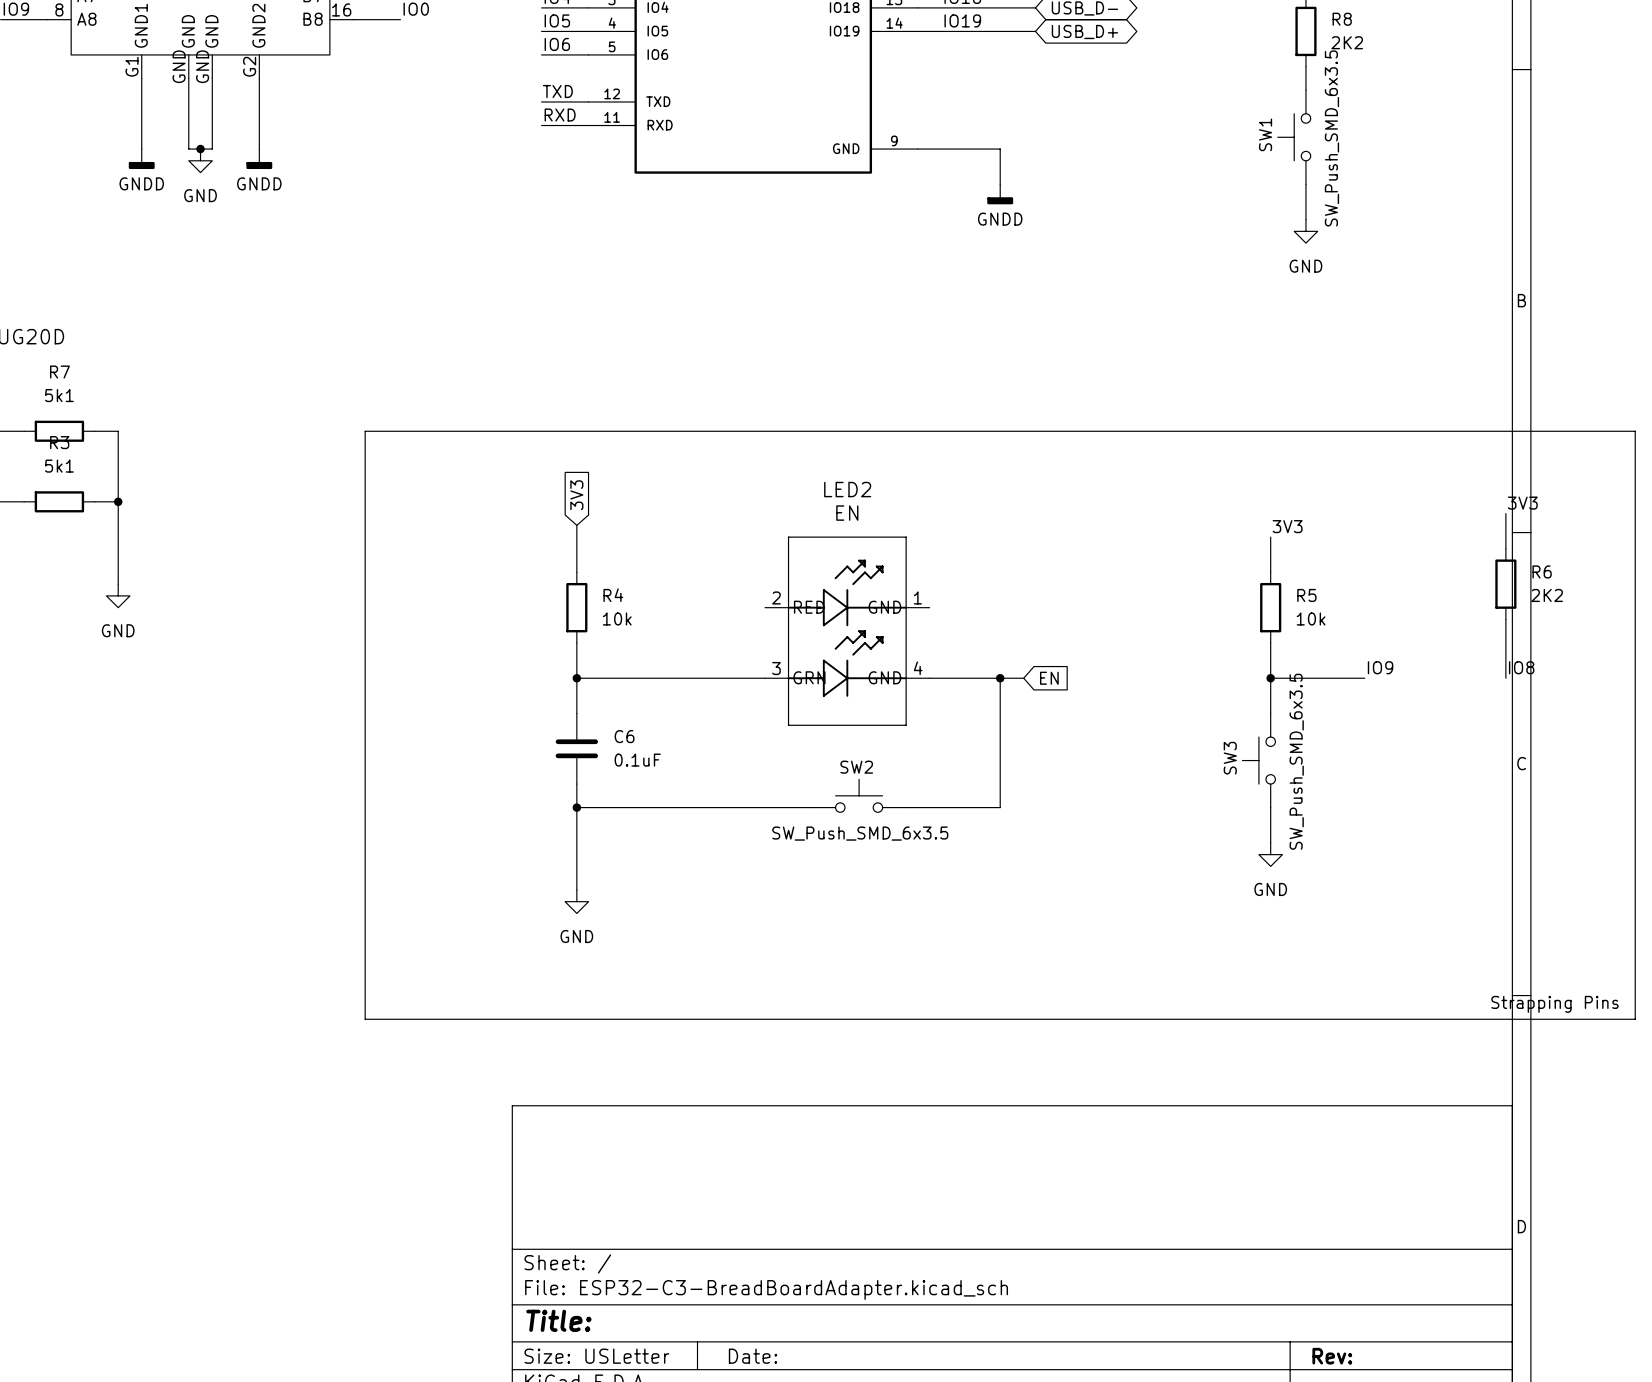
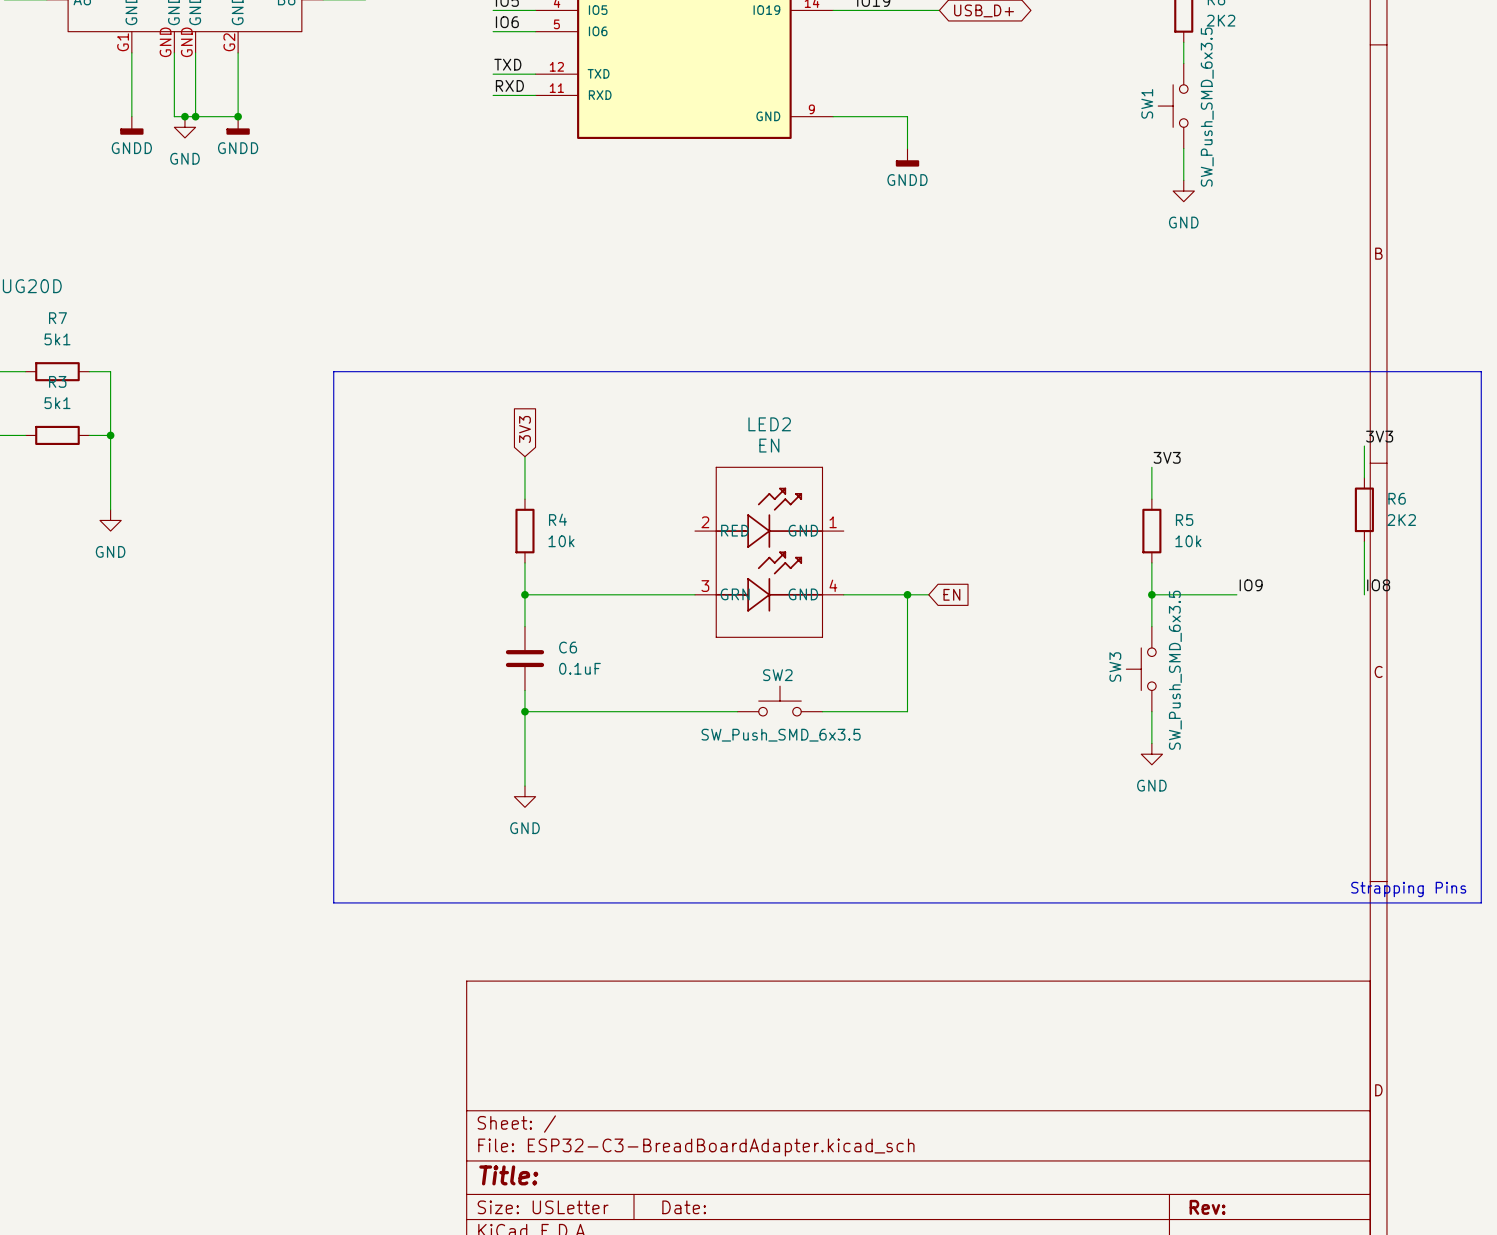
wire: none -> (195, 116) (238, 116)
junction: none -> (195, 116)
junction: none -> (238, 116)

